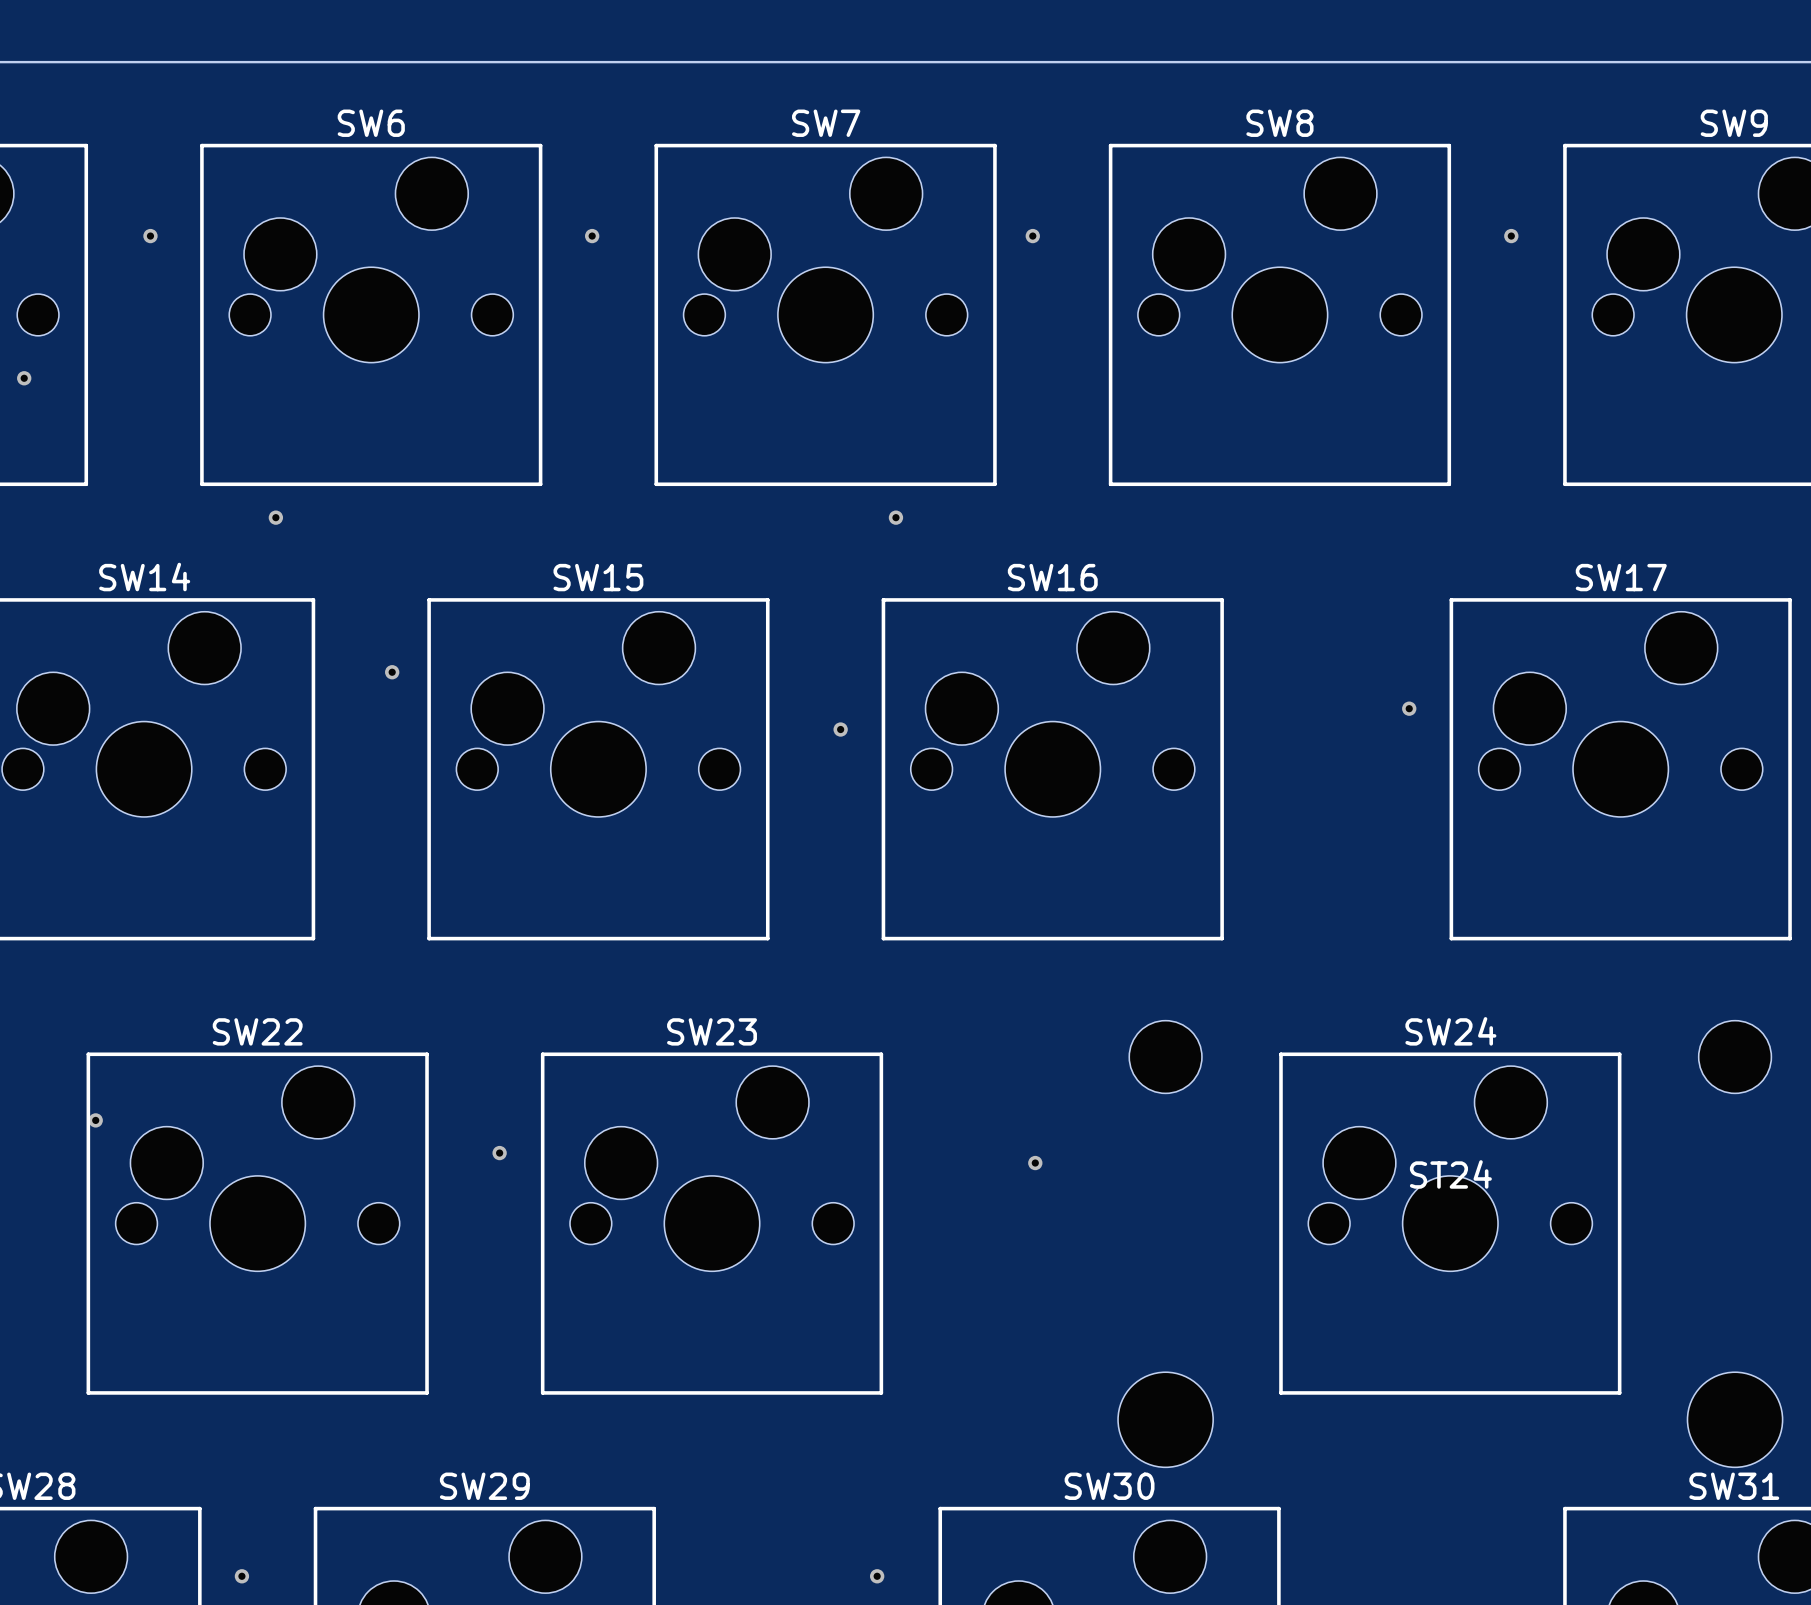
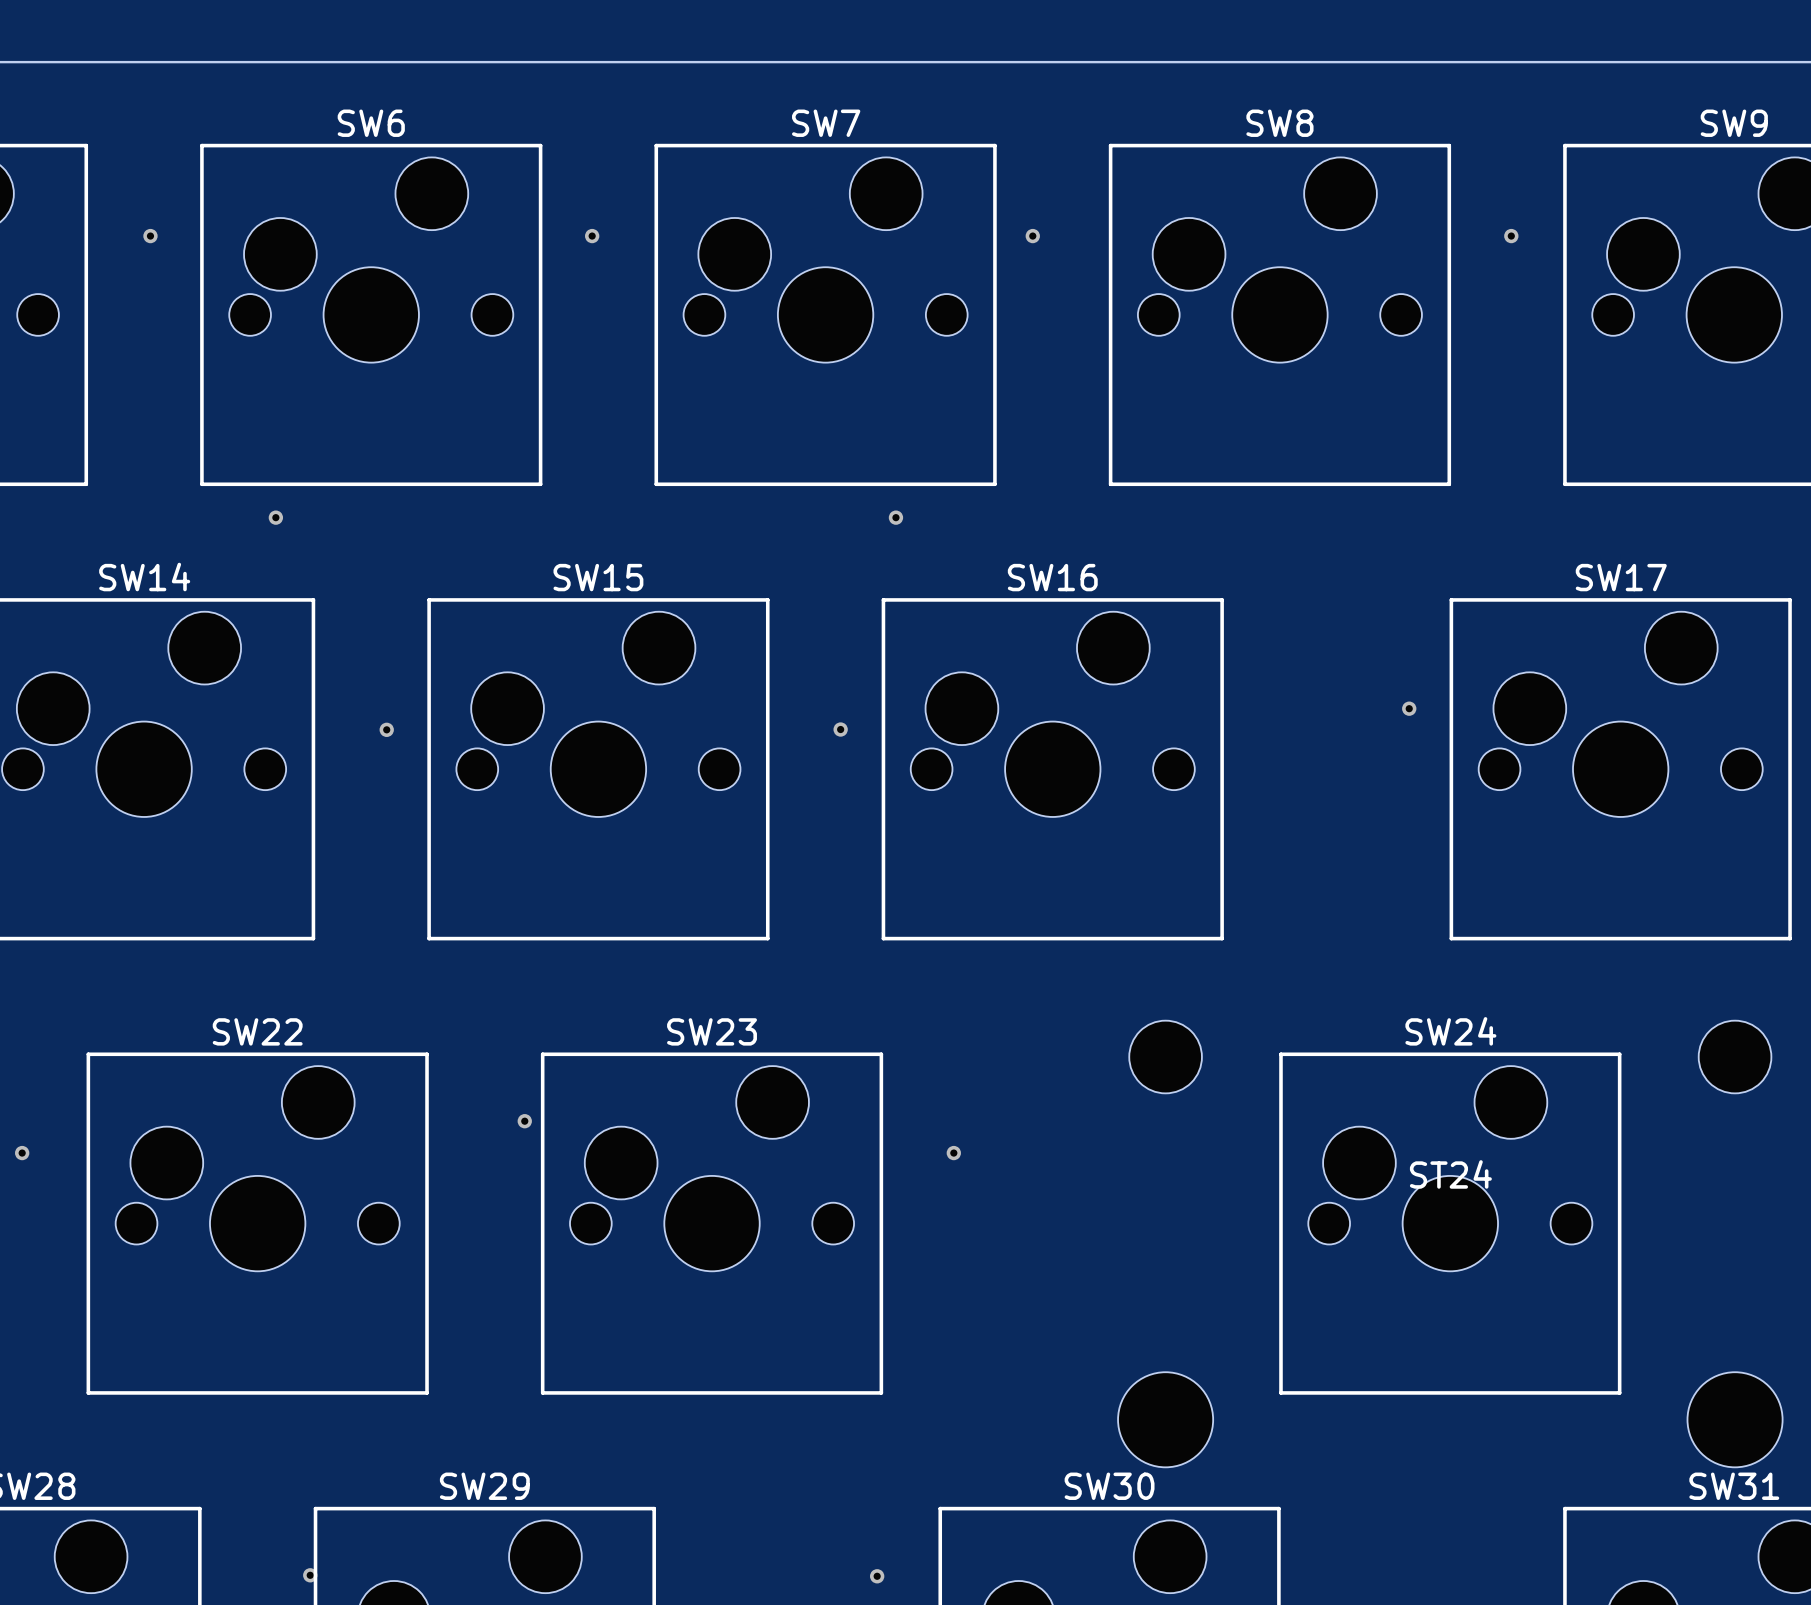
via: (24, 378) -> none
via position: (392, 672) -> (386, 729)
via position: (95, 1120) -> (22, 1153)
via position: (499, 1153) -> (524, 1121)
via position: (1035, 1163) -> (953, 1153)
via position: (241, 1576) -> (310, 1575)

